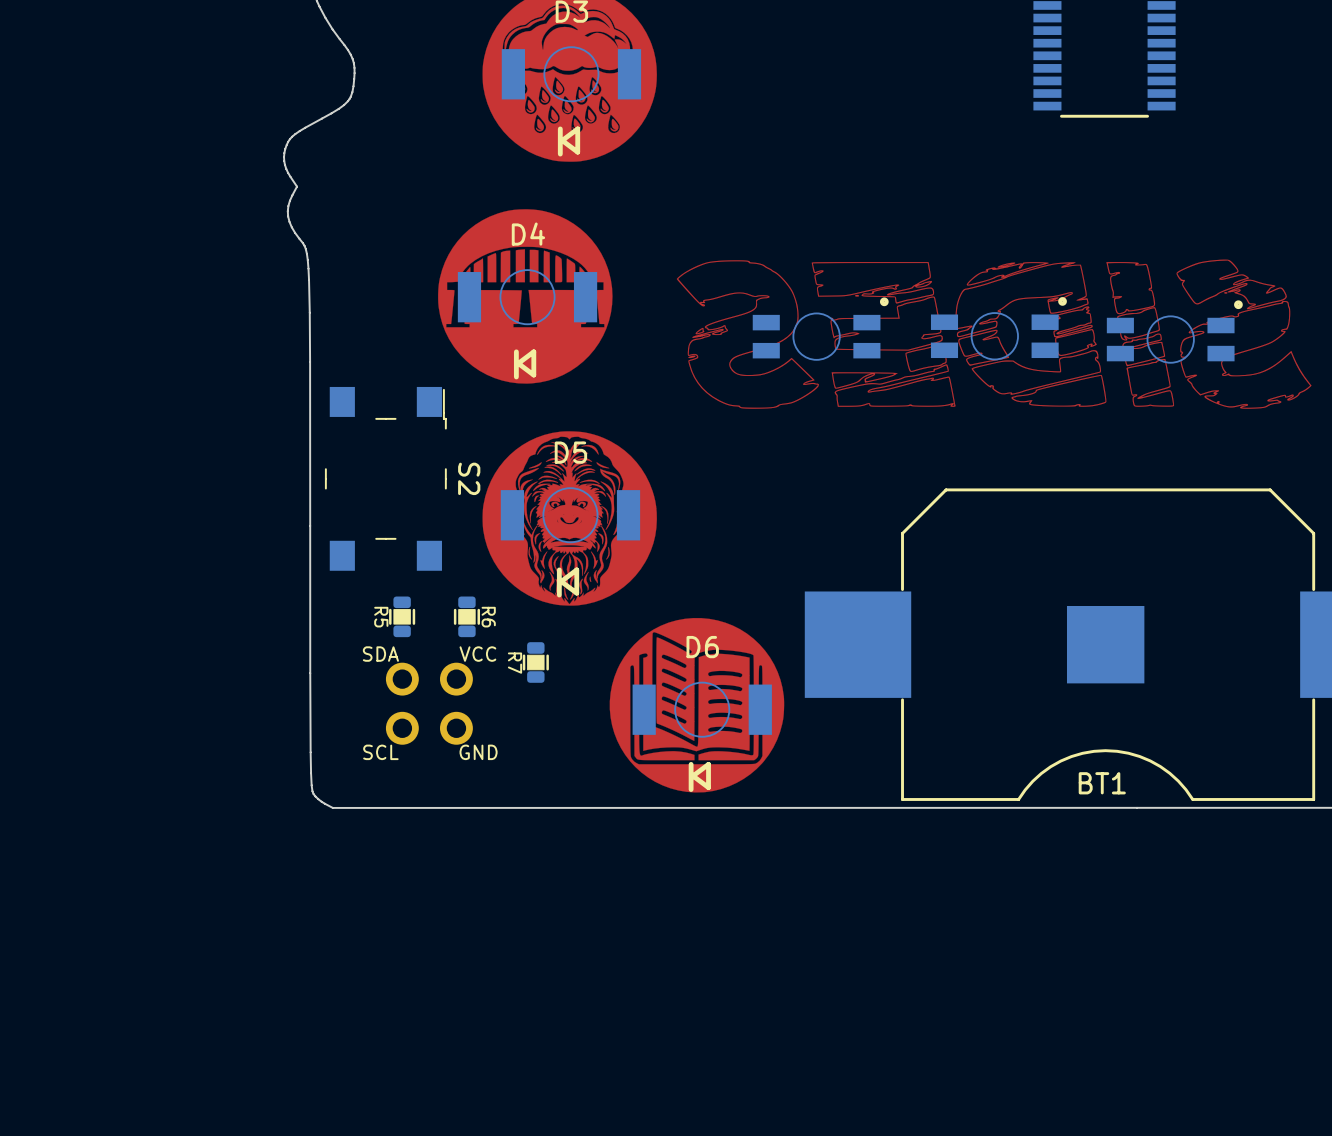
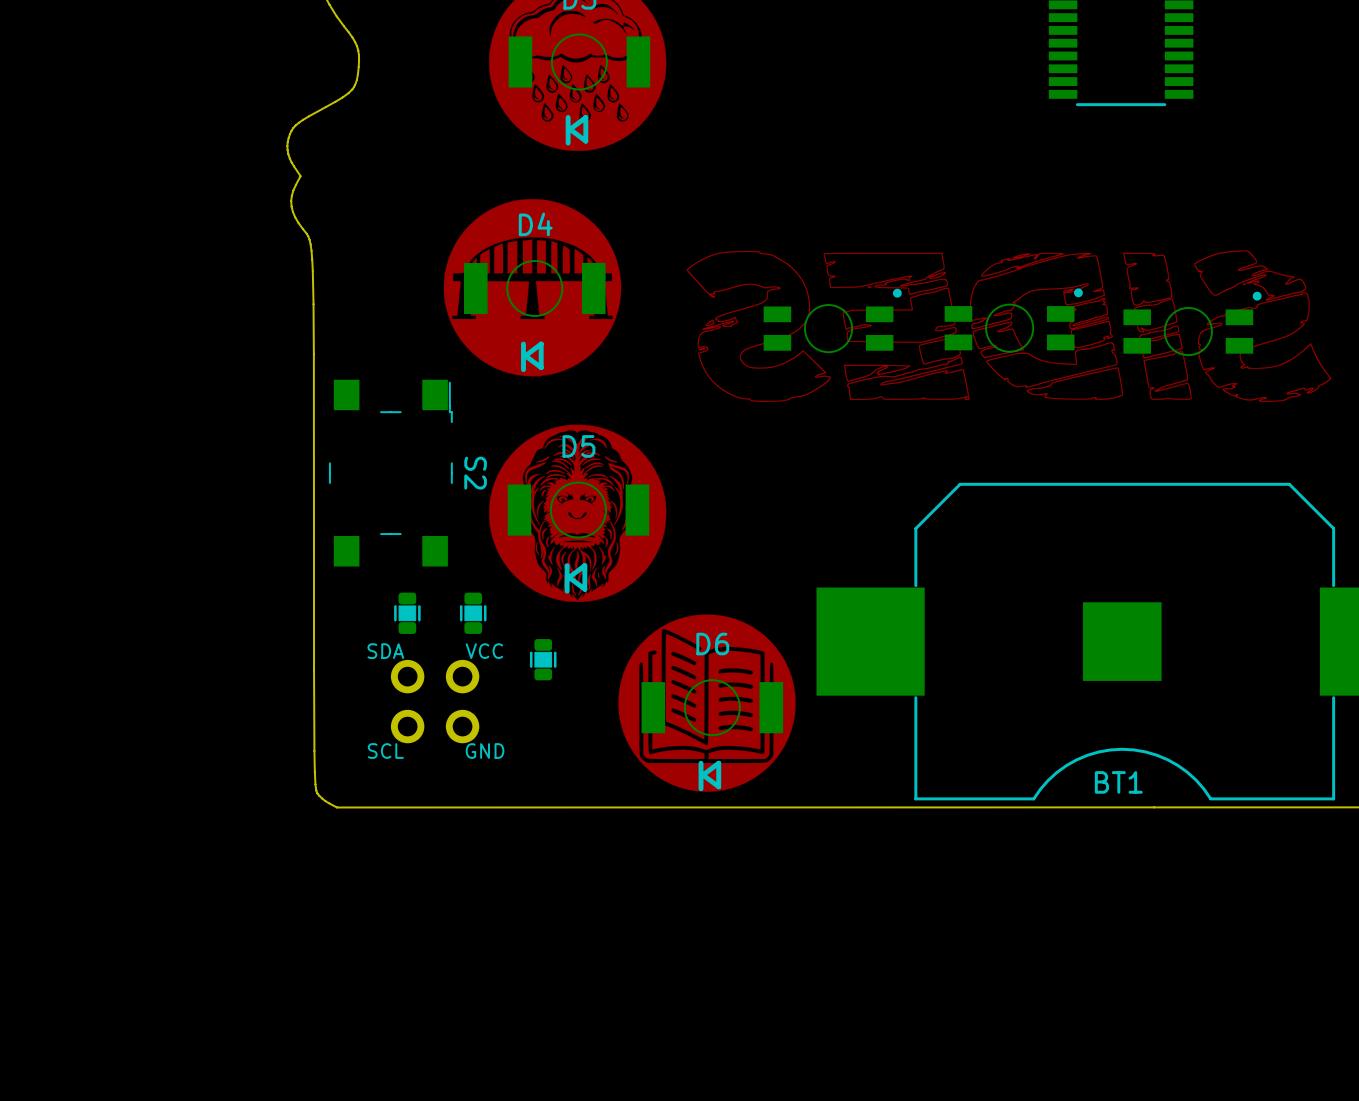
R5 name: R5 (381, 617) -> none
R6 name: R6 (488, 617) -> none
R7 name: R7 (515, 663) -> none

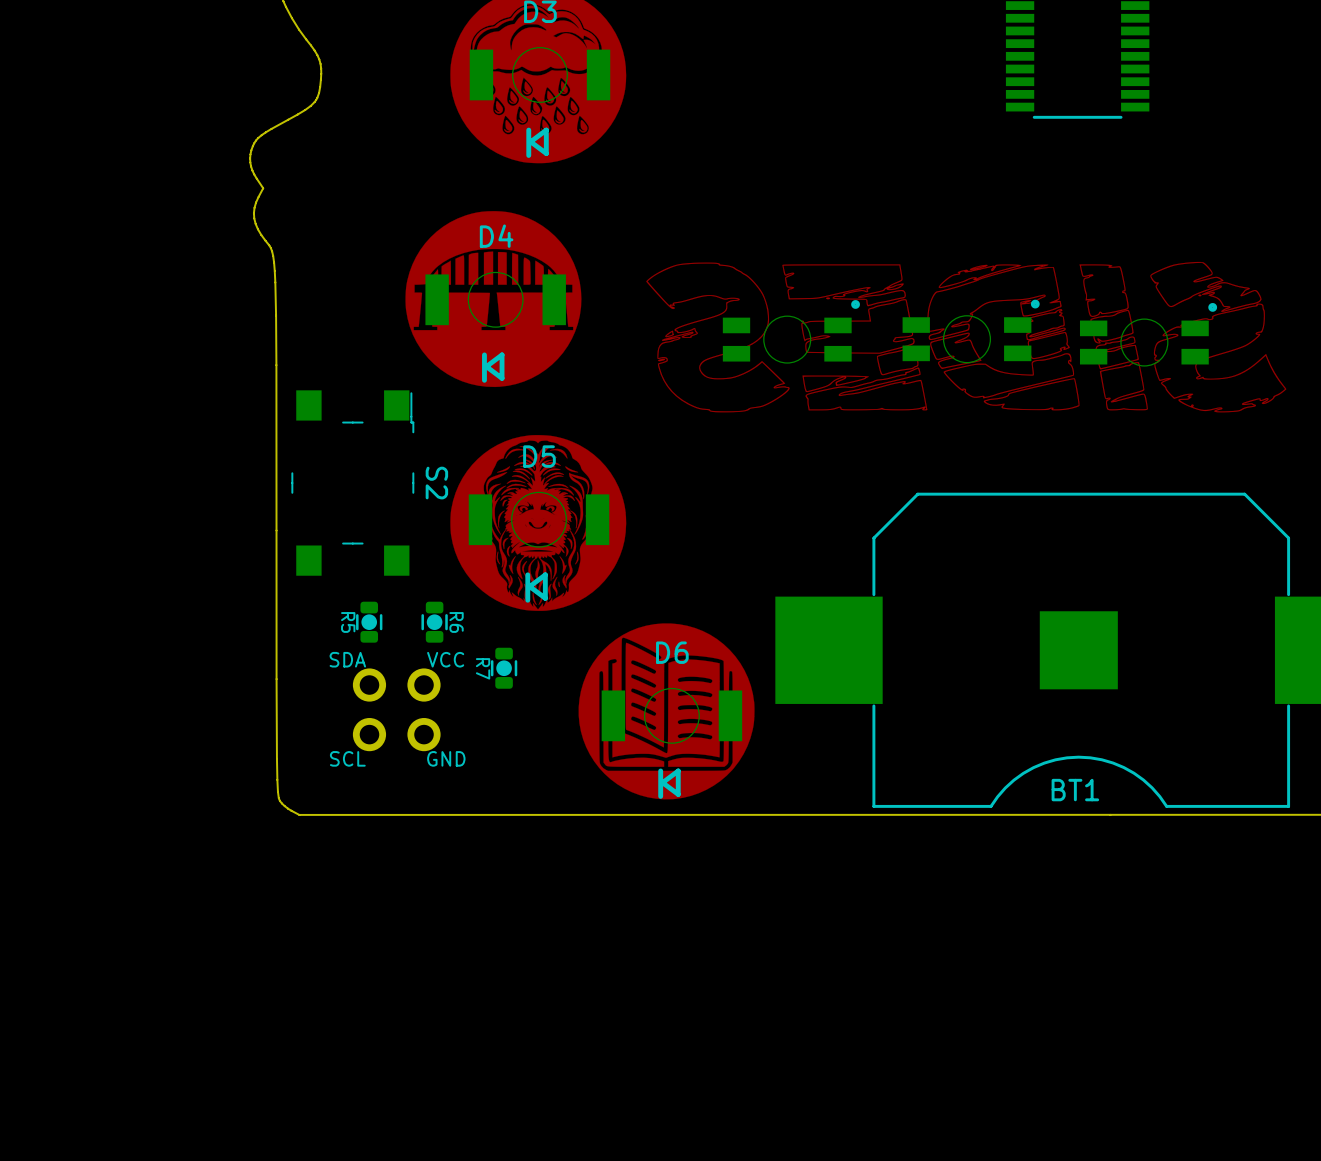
part: (407, 613) -> none
R5: none -> (369, 622)
part: (473, 613) -> none
R6: none -> (434, 622)
part: (543, 659) -> none
R7: none -> (504, 668)

